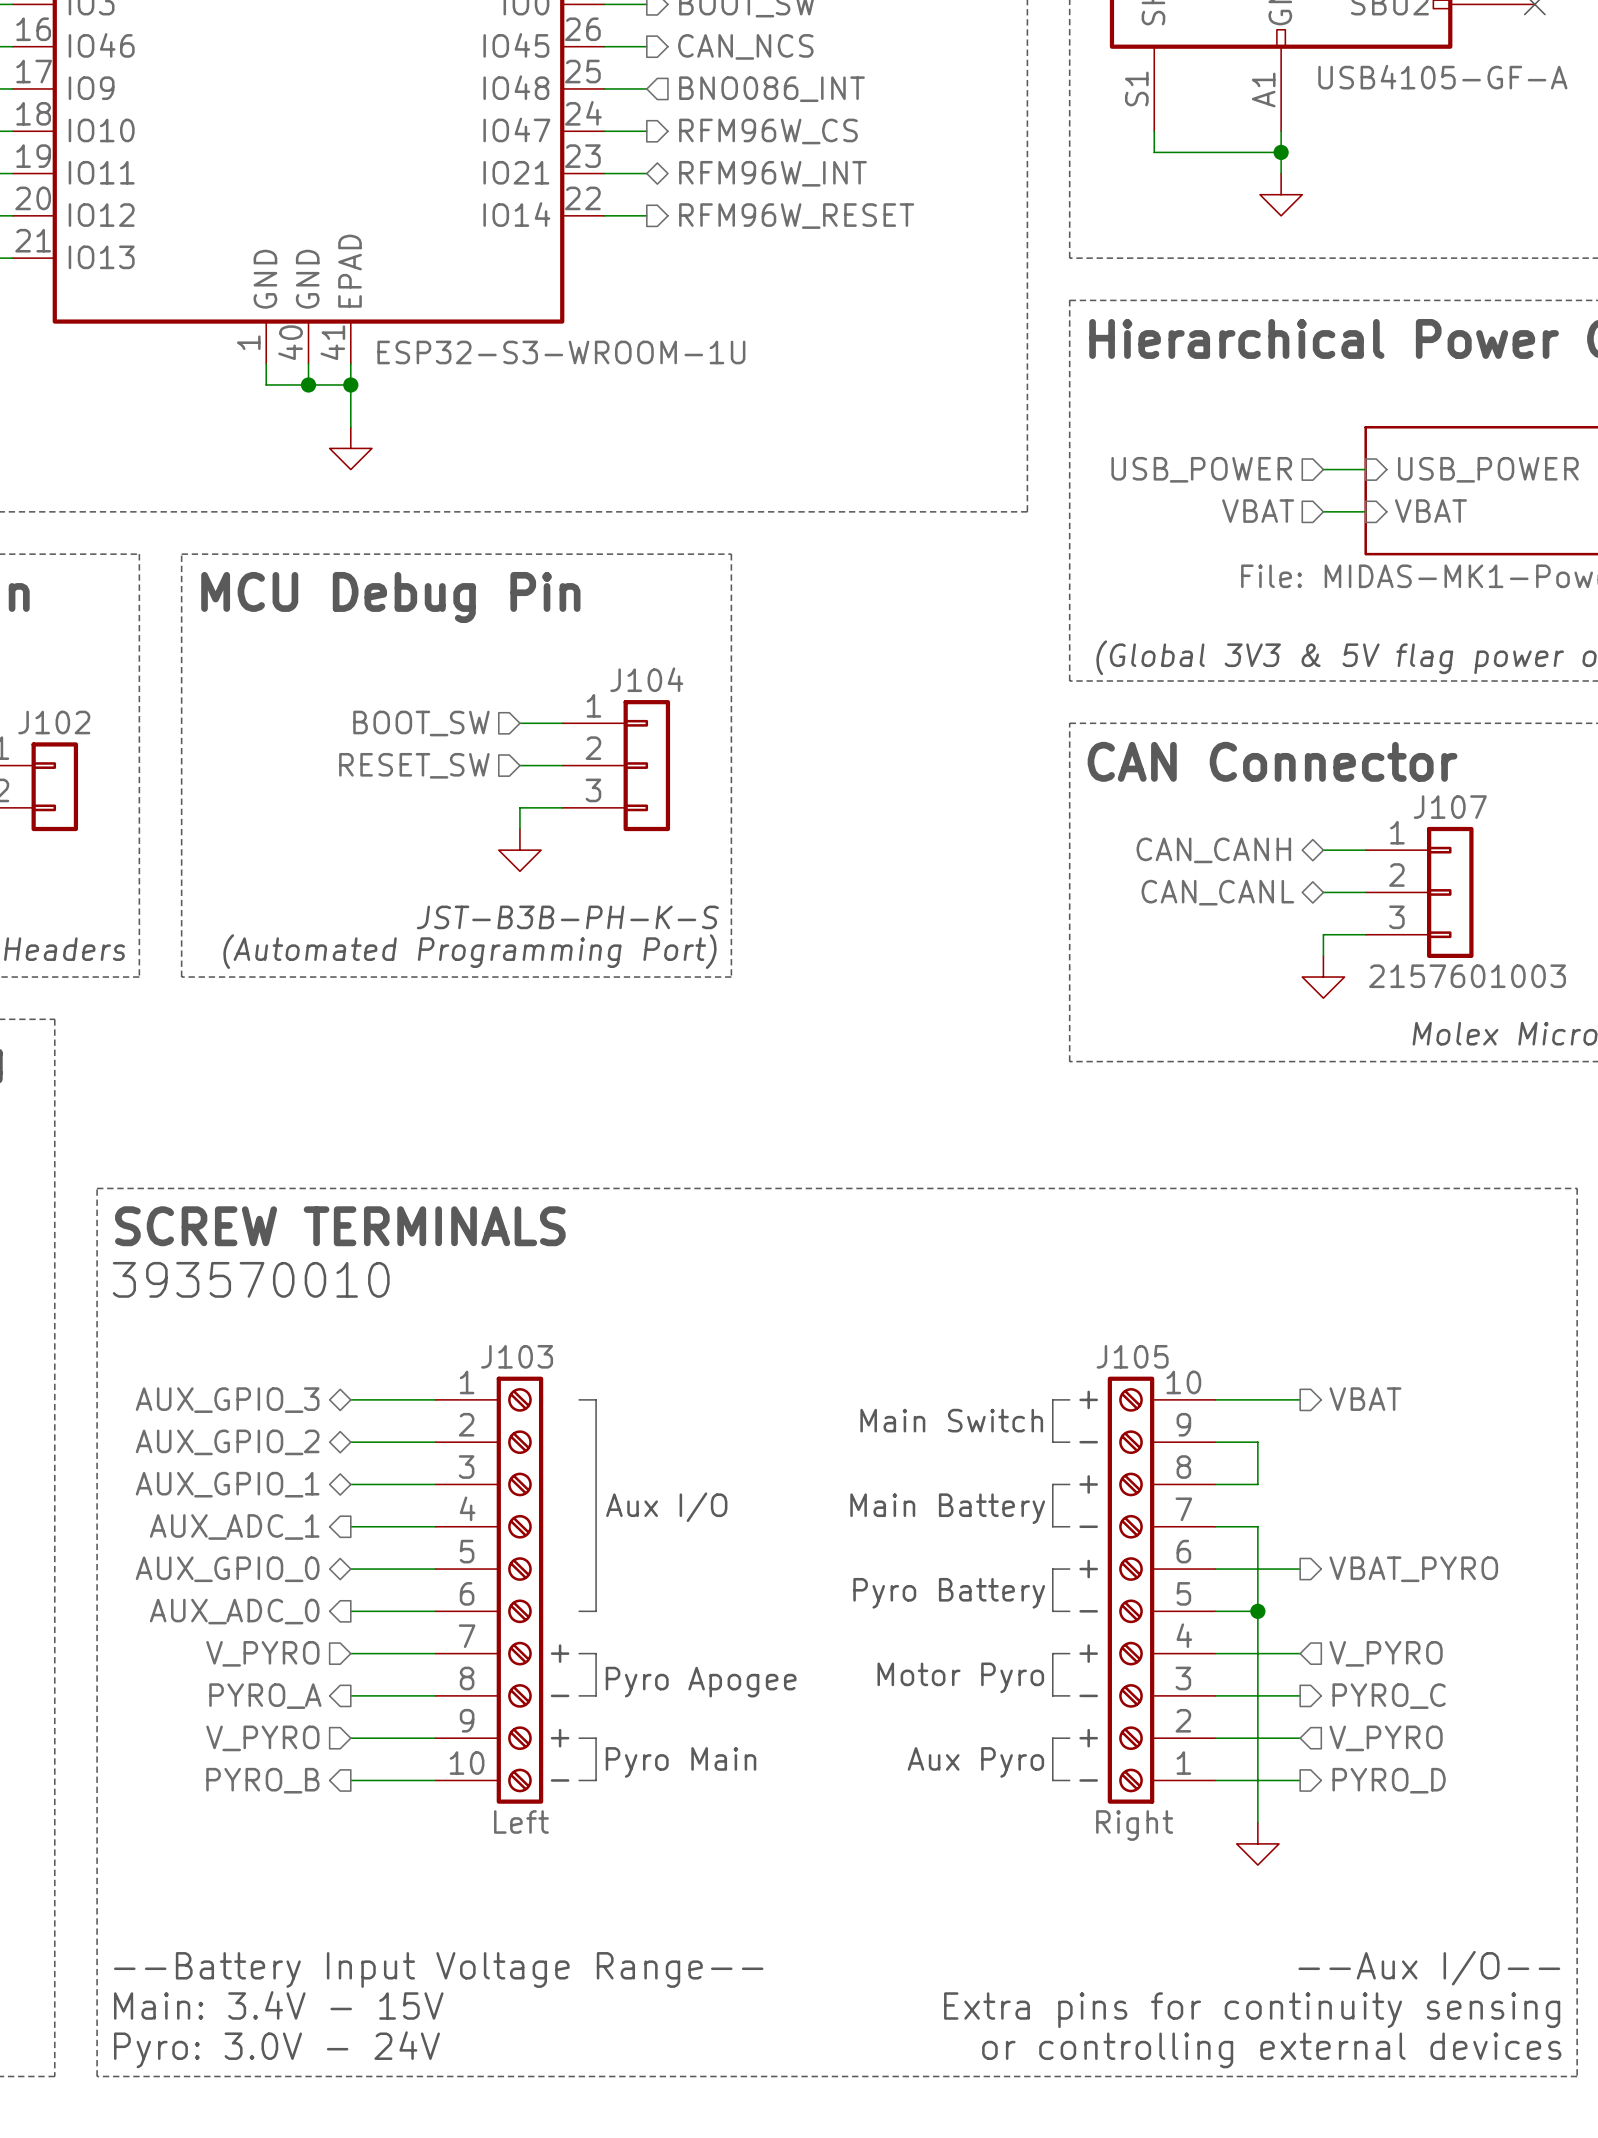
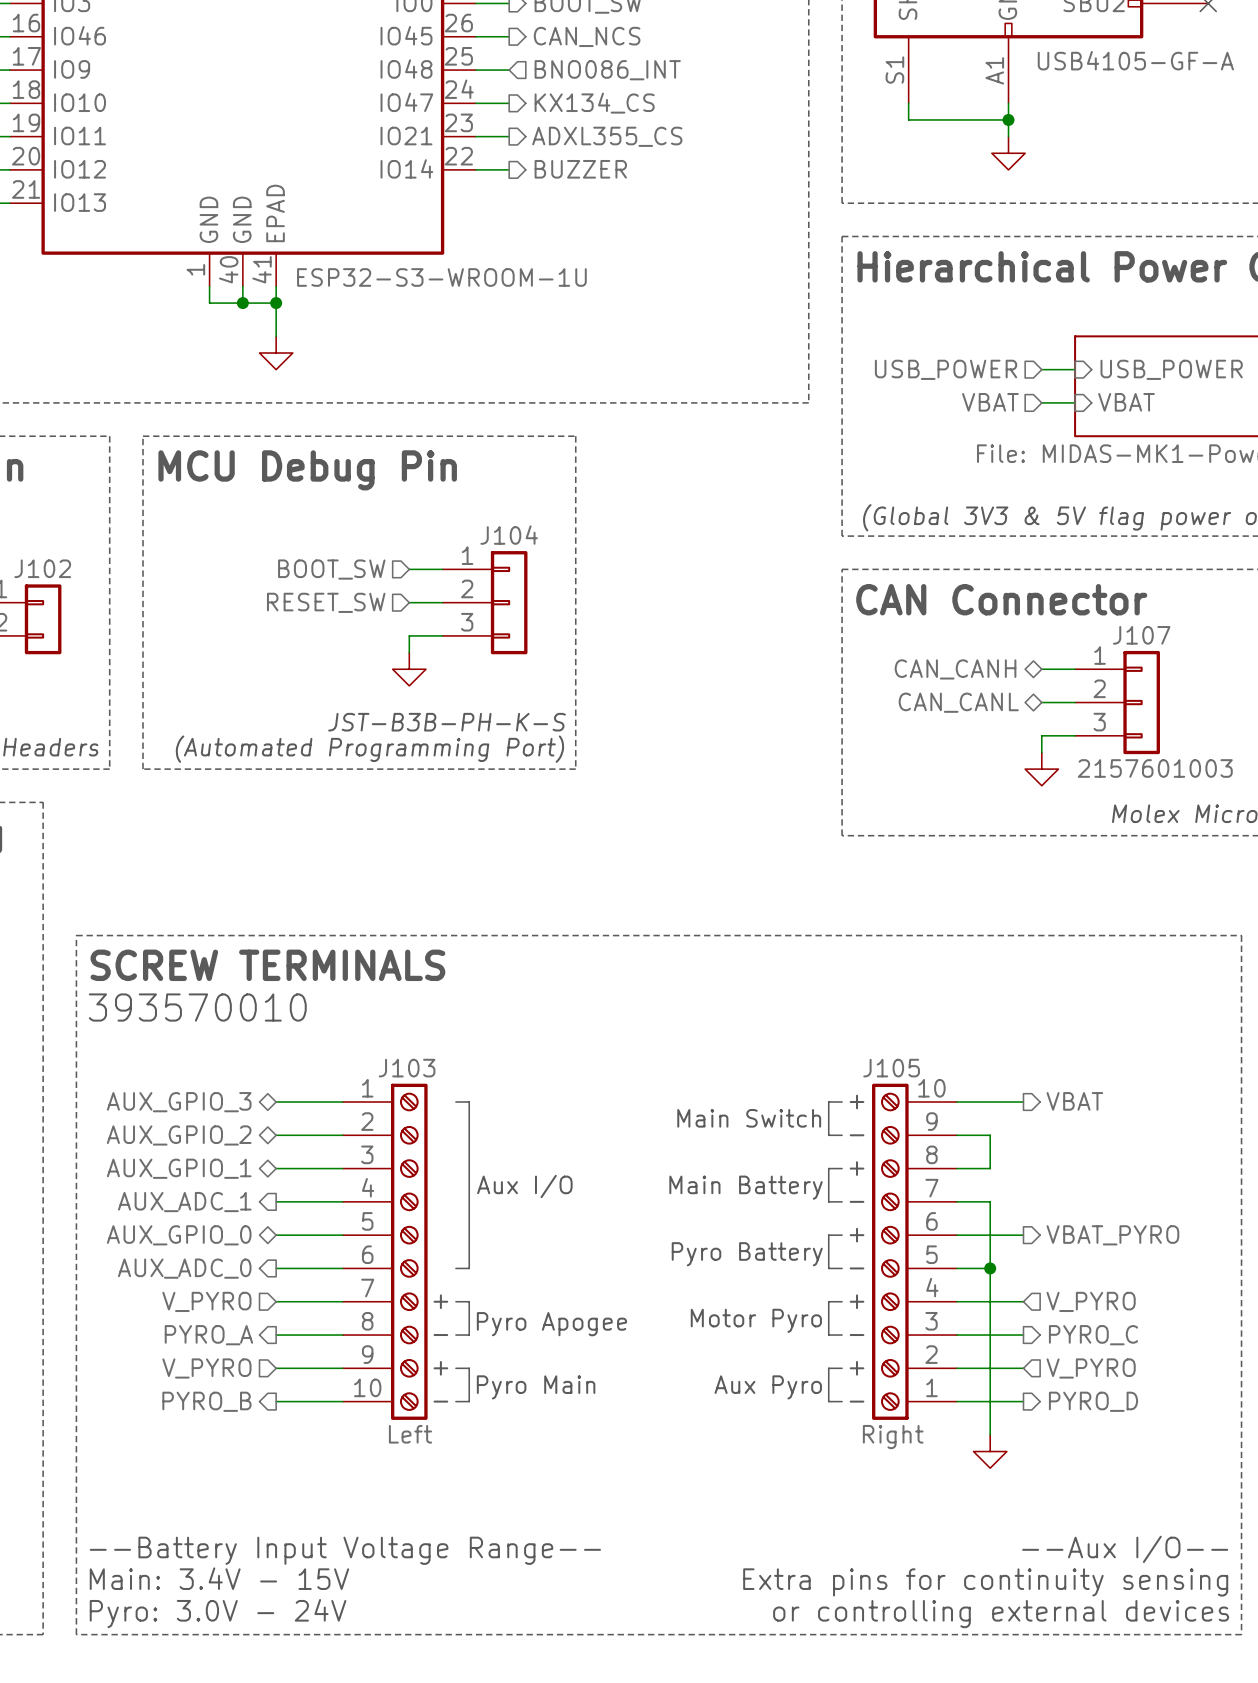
hierarchical label: RFM96W_CS (768, 131) -> KX134_CS (594, 103)
hierarchical label shape: bidirectional (772, 173) -> output (607, 136)
hierarchical label: RFM96W_INT (772, 173) -> ADXL355_CS (607, 136)
hierarchical label: RFM96W_RESET (796, 216) -> BUZZER (580, 169)

